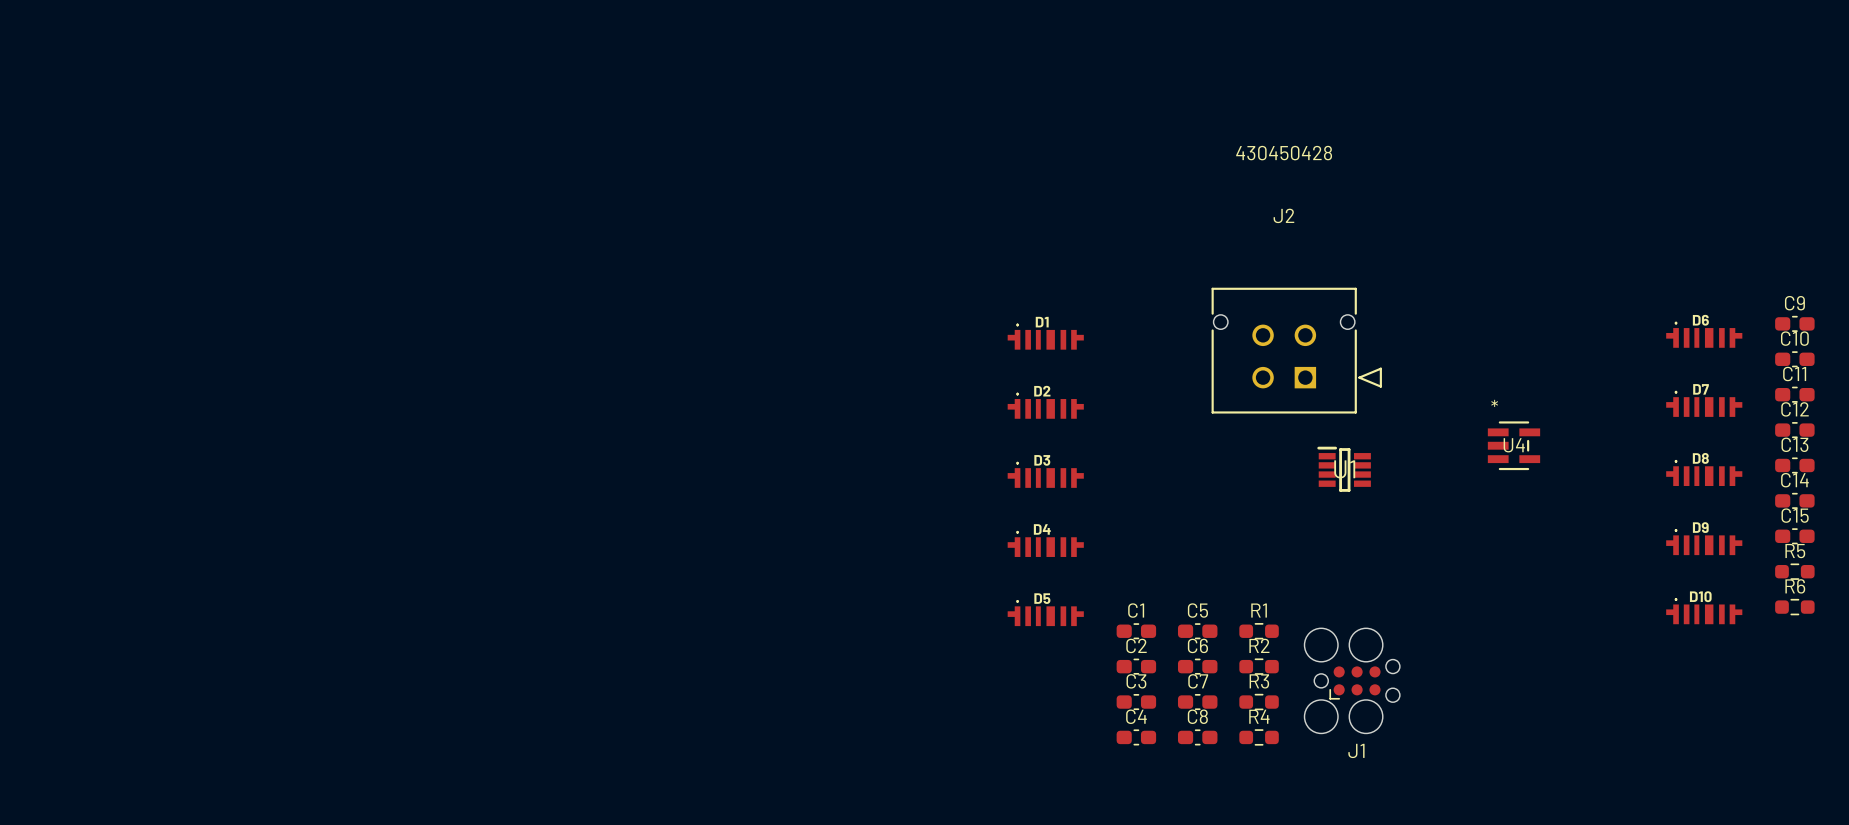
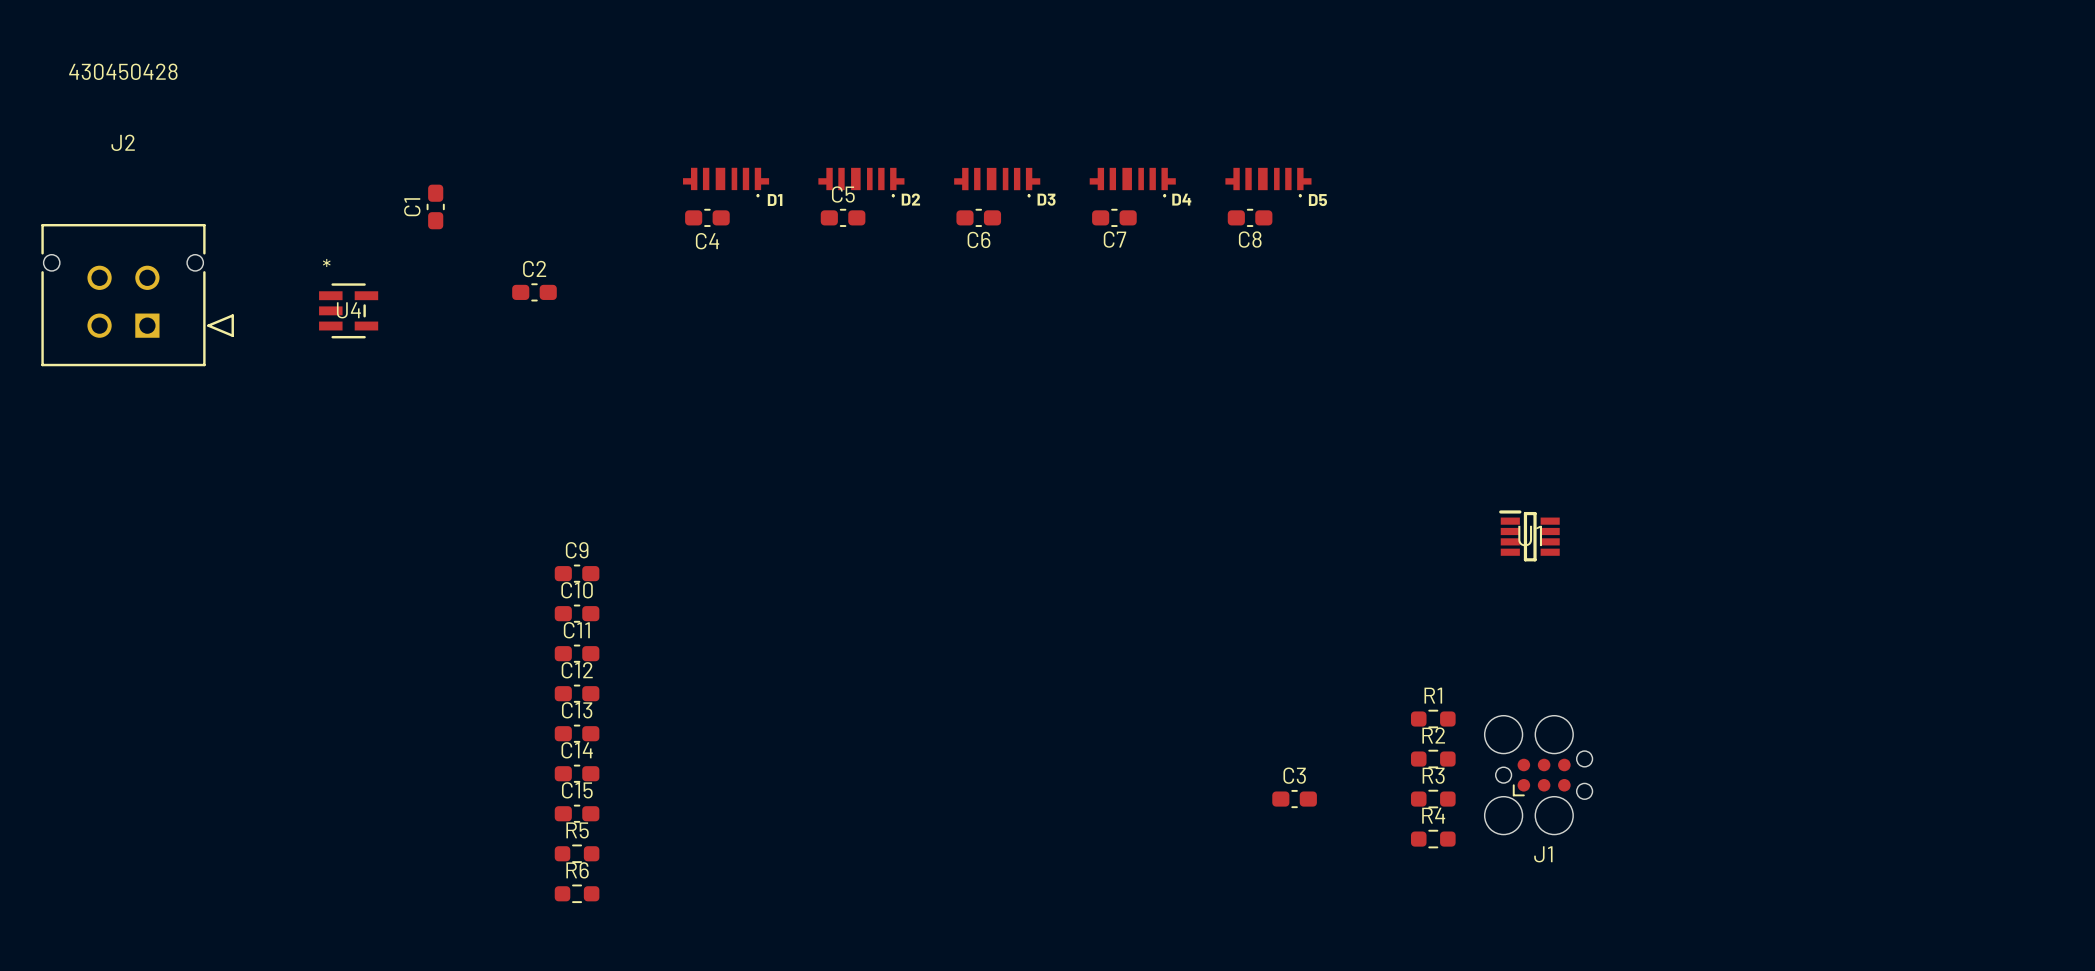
D1 name position: D1 (1042, 322) -> D1 (775, 200)
C9 position: (1794, 323) -> (577, 573)
D6: (1704, 334) -> none
D1 rotation: 0° (1045, 336) -> 180° (726, 182)
D1 position: (1045, 336) -> (726, 182)
J2 position: (1296, 350) -> (137, 295)
C10 position: (1794, 359) -> (577, 613)
D2 name position: D2 (1042, 391) -> D2 (910, 199)
C11 position: (1794, 394) -> (577, 653)
D7: (1704, 403) -> none
D2 rotation: 0° (1045, 405) -> 180° (861, 182)
D2 position: (1045, 405) -> (861, 182)
C12 position: (1794, 430) -> (577, 693)
U4 position: (1513, 445) -> (348, 310)
D3 name position: D3 (1042, 460) -> D3 (1046, 199)
C13 position: (1794, 465) -> (577, 733)
D8: (1704, 472) -> none
D3 rotation: 0° (1045, 474) -> 180° (997, 182)
D3 position: (1045, 474) -> (997, 182)
C14 position: (1794, 500) -> (577, 773)
D4 name position: D4 (1042, 529) -> D4 (1181, 199)
C15 position: (1794, 536) -> (577, 813)
D9: (1704, 542) -> none
D4 rotation: 0° (1045, 543) -> 180° (1132, 182)
D4 position: (1045, 543) -> (1132, 182)
R5 position: (1794, 571) -> (577, 853)
D5 name position: D5 (1042, 598) -> D5 (1317, 200)
R6 position: (1794, 607) -> (577, 893)
C1 name position: C1 (1136, 610) -> C1 (412, 207)
D10: (1704, 611) -> none
D5 rotation: 0° (1045, 613) -> 180° (1268, 182)
D5 position: (1045, 613) -> (1268, 182)
C1 rotation: 0° (1136, 631) -> 90° clockwise (435, 206)
C1 position: (1136, 631) -> (435, 206)
C5 position: (1197, 631) -> (843, 217)
C6 name position: C6 (1197, 645) -> C6 (979, 239)
C2 position: (1136, 666) -> (534, 292)
C6 position: (1197, 666) -> (978, 217)
C7 name position: C7 (1198, 681) -> C7 (1115, 239)
C7 position: (1197, 702) -> (1114, 217)
C4 name position: C4 (1136, 716) -> C4 (707, 241)
C8 name position: C8 (1197, 716) -> C8 (1250, 239)
C4 position: (1136, 737) -> (707, 217)
C8 position: (1197, 737) -> (1250, 217)

